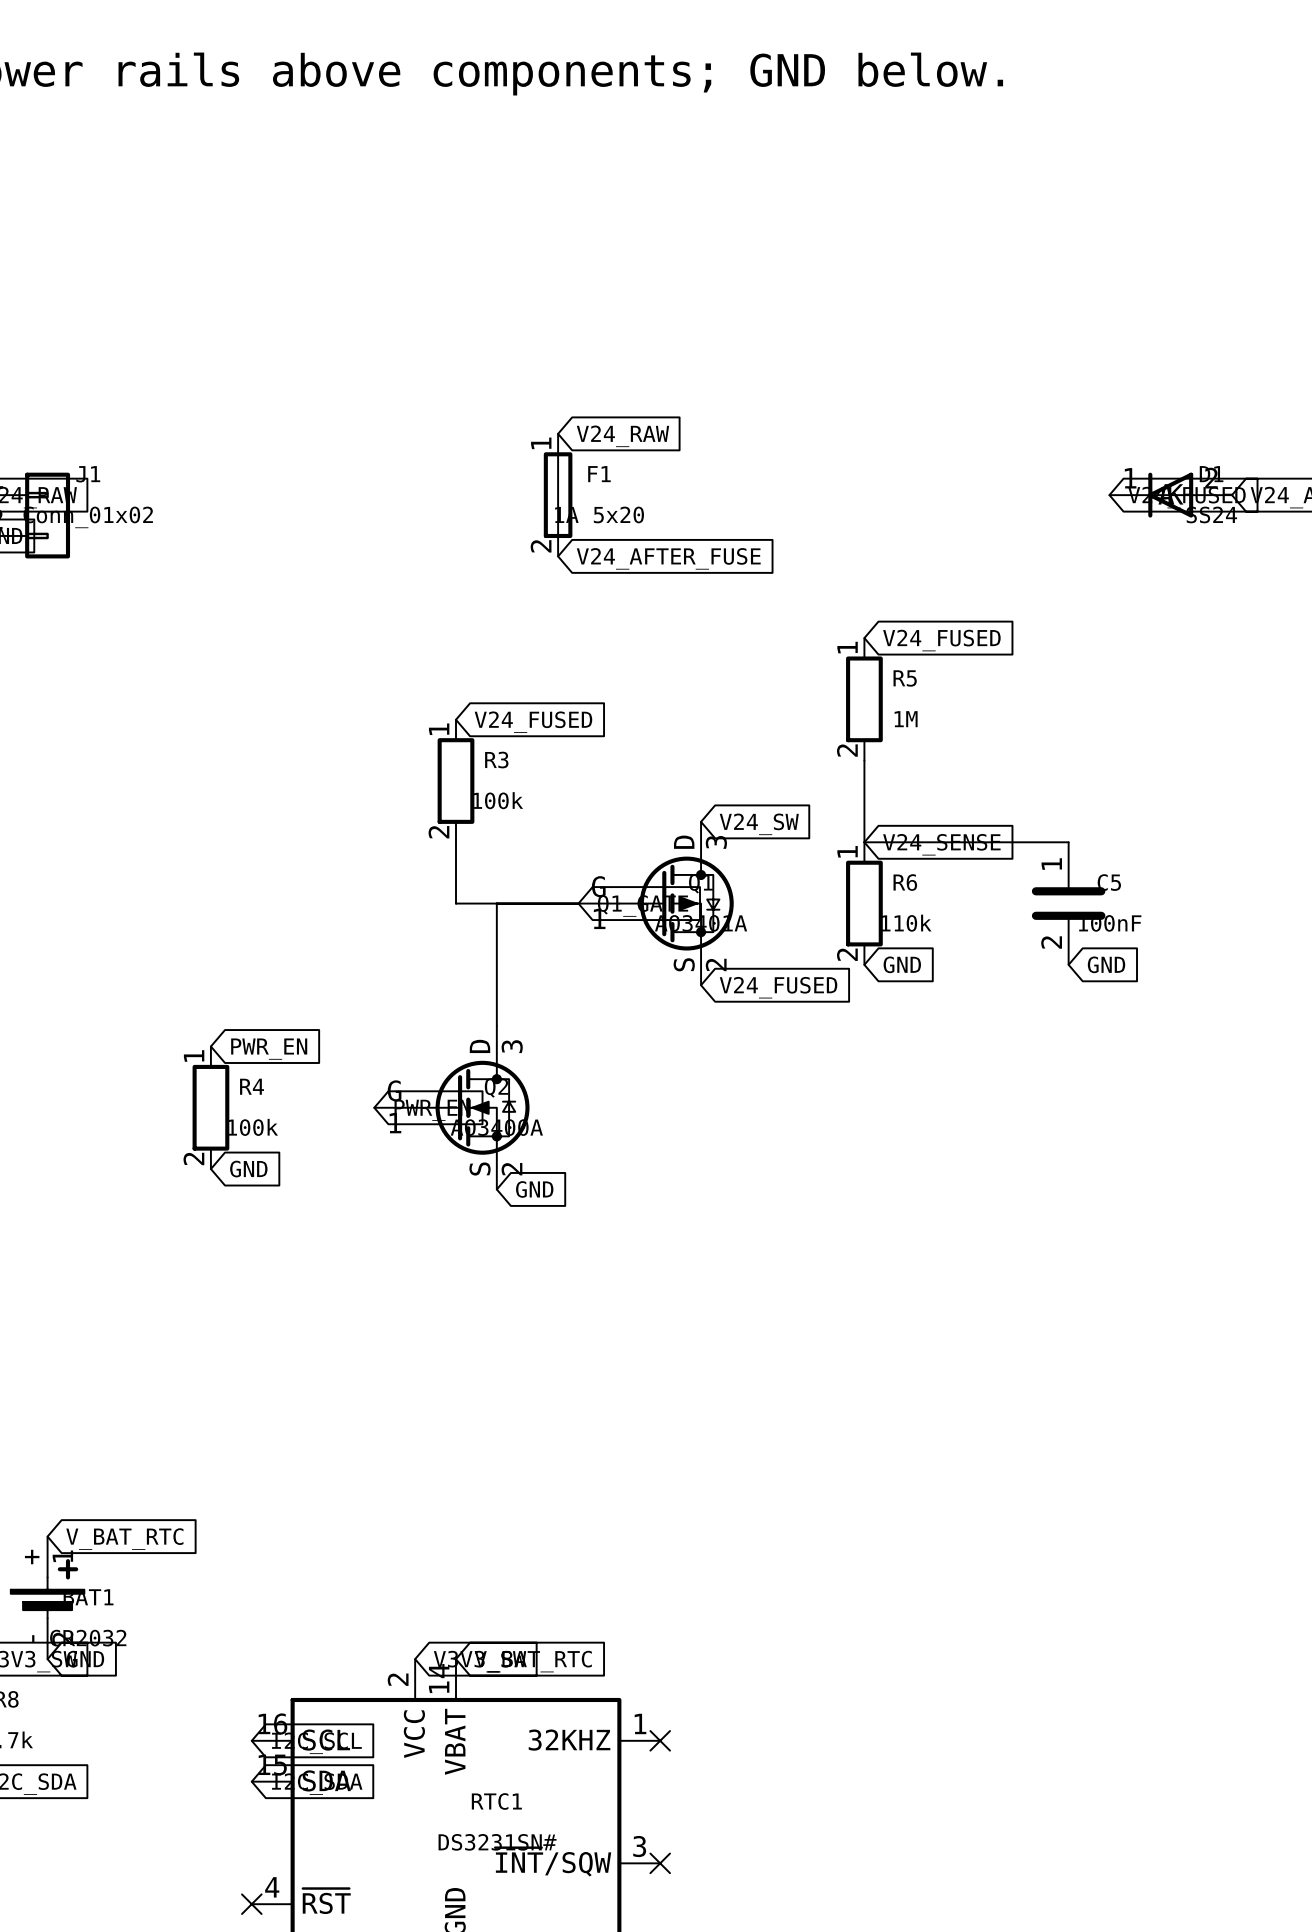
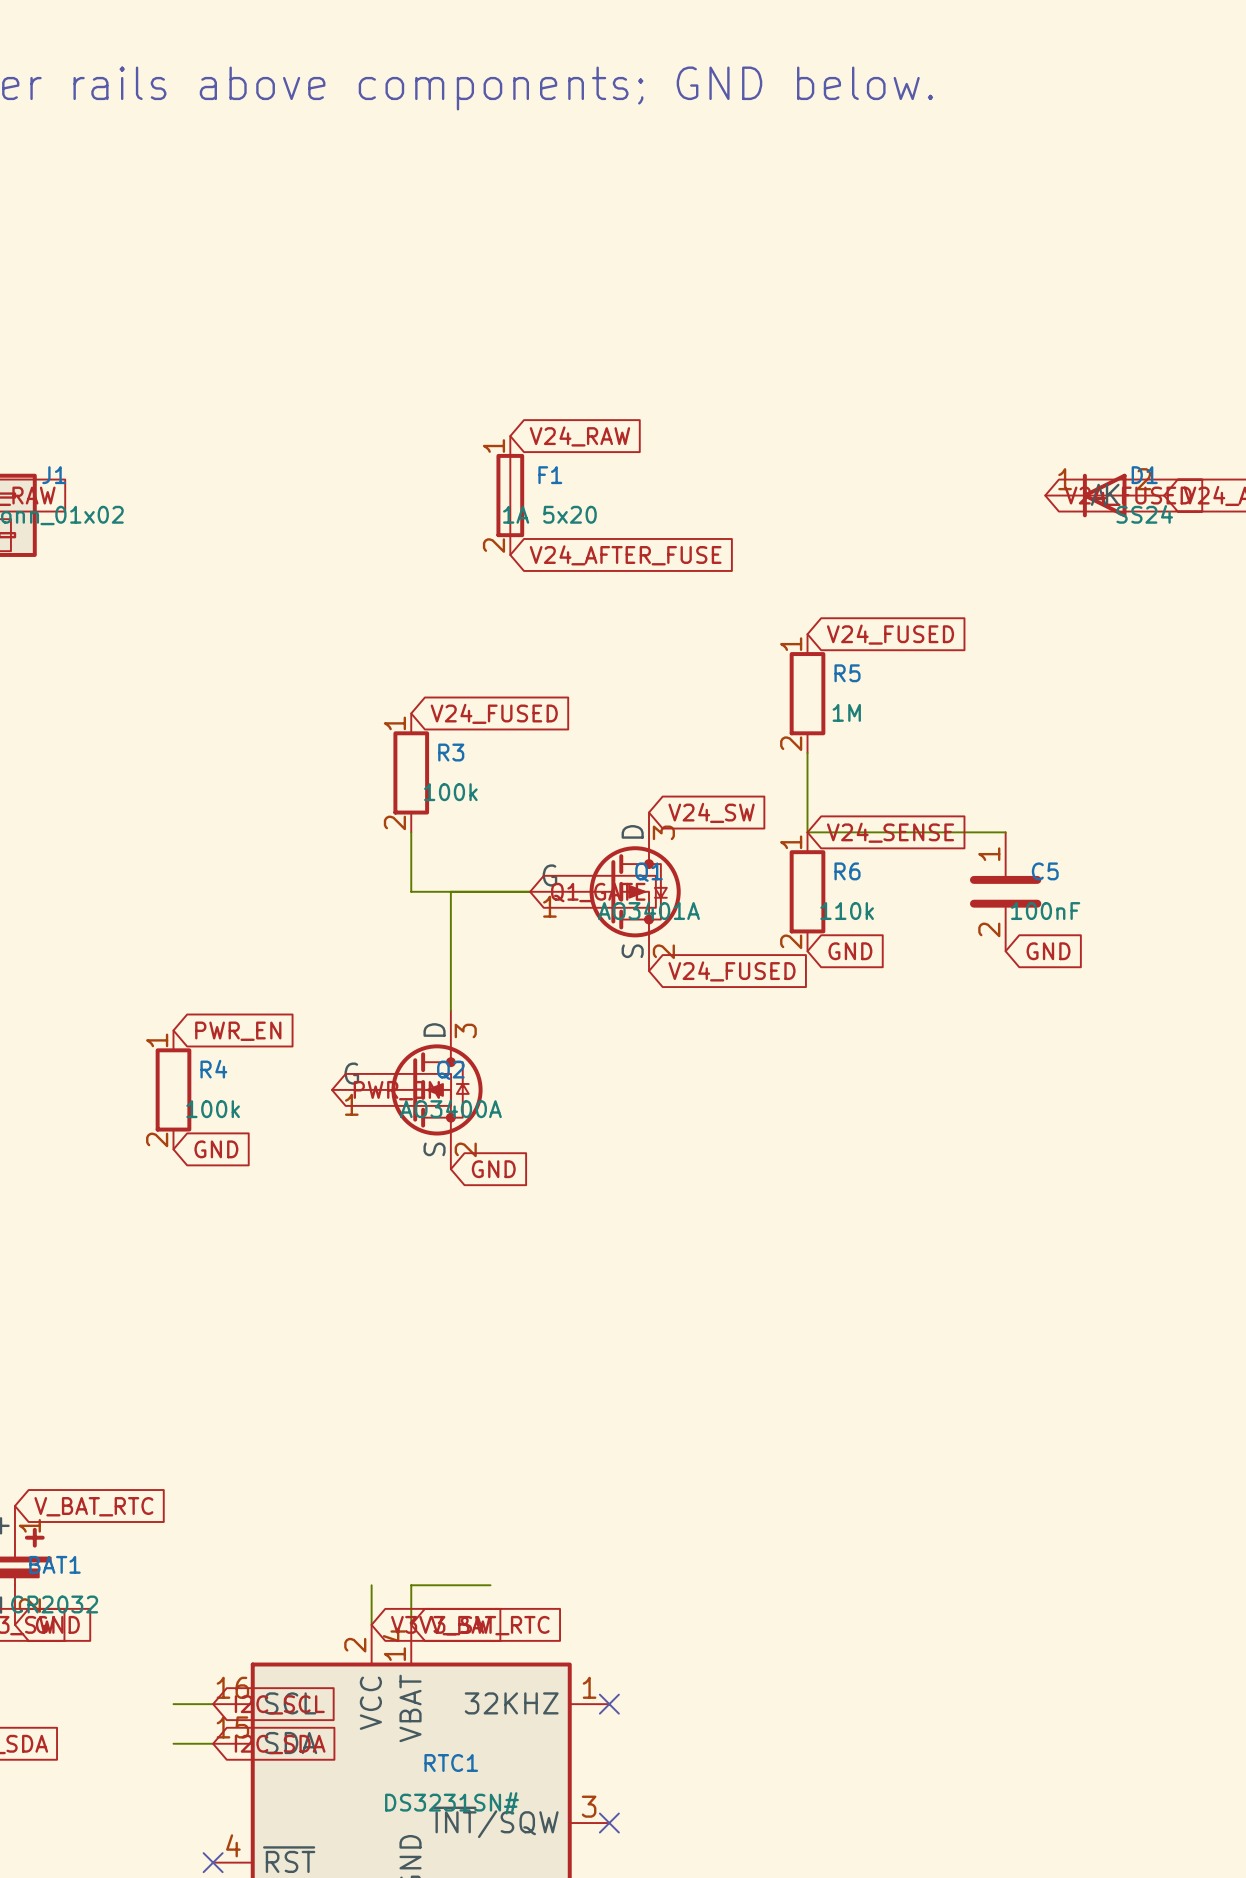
wire: none -> (371, 1585) (371, 1624)
wire: none -> (490, 1585) (411, 1585) (411, 1624)
wire: none -> (173, 1704) (213, 1704)
wire: none -> (173, 1743) (213, 1743)

